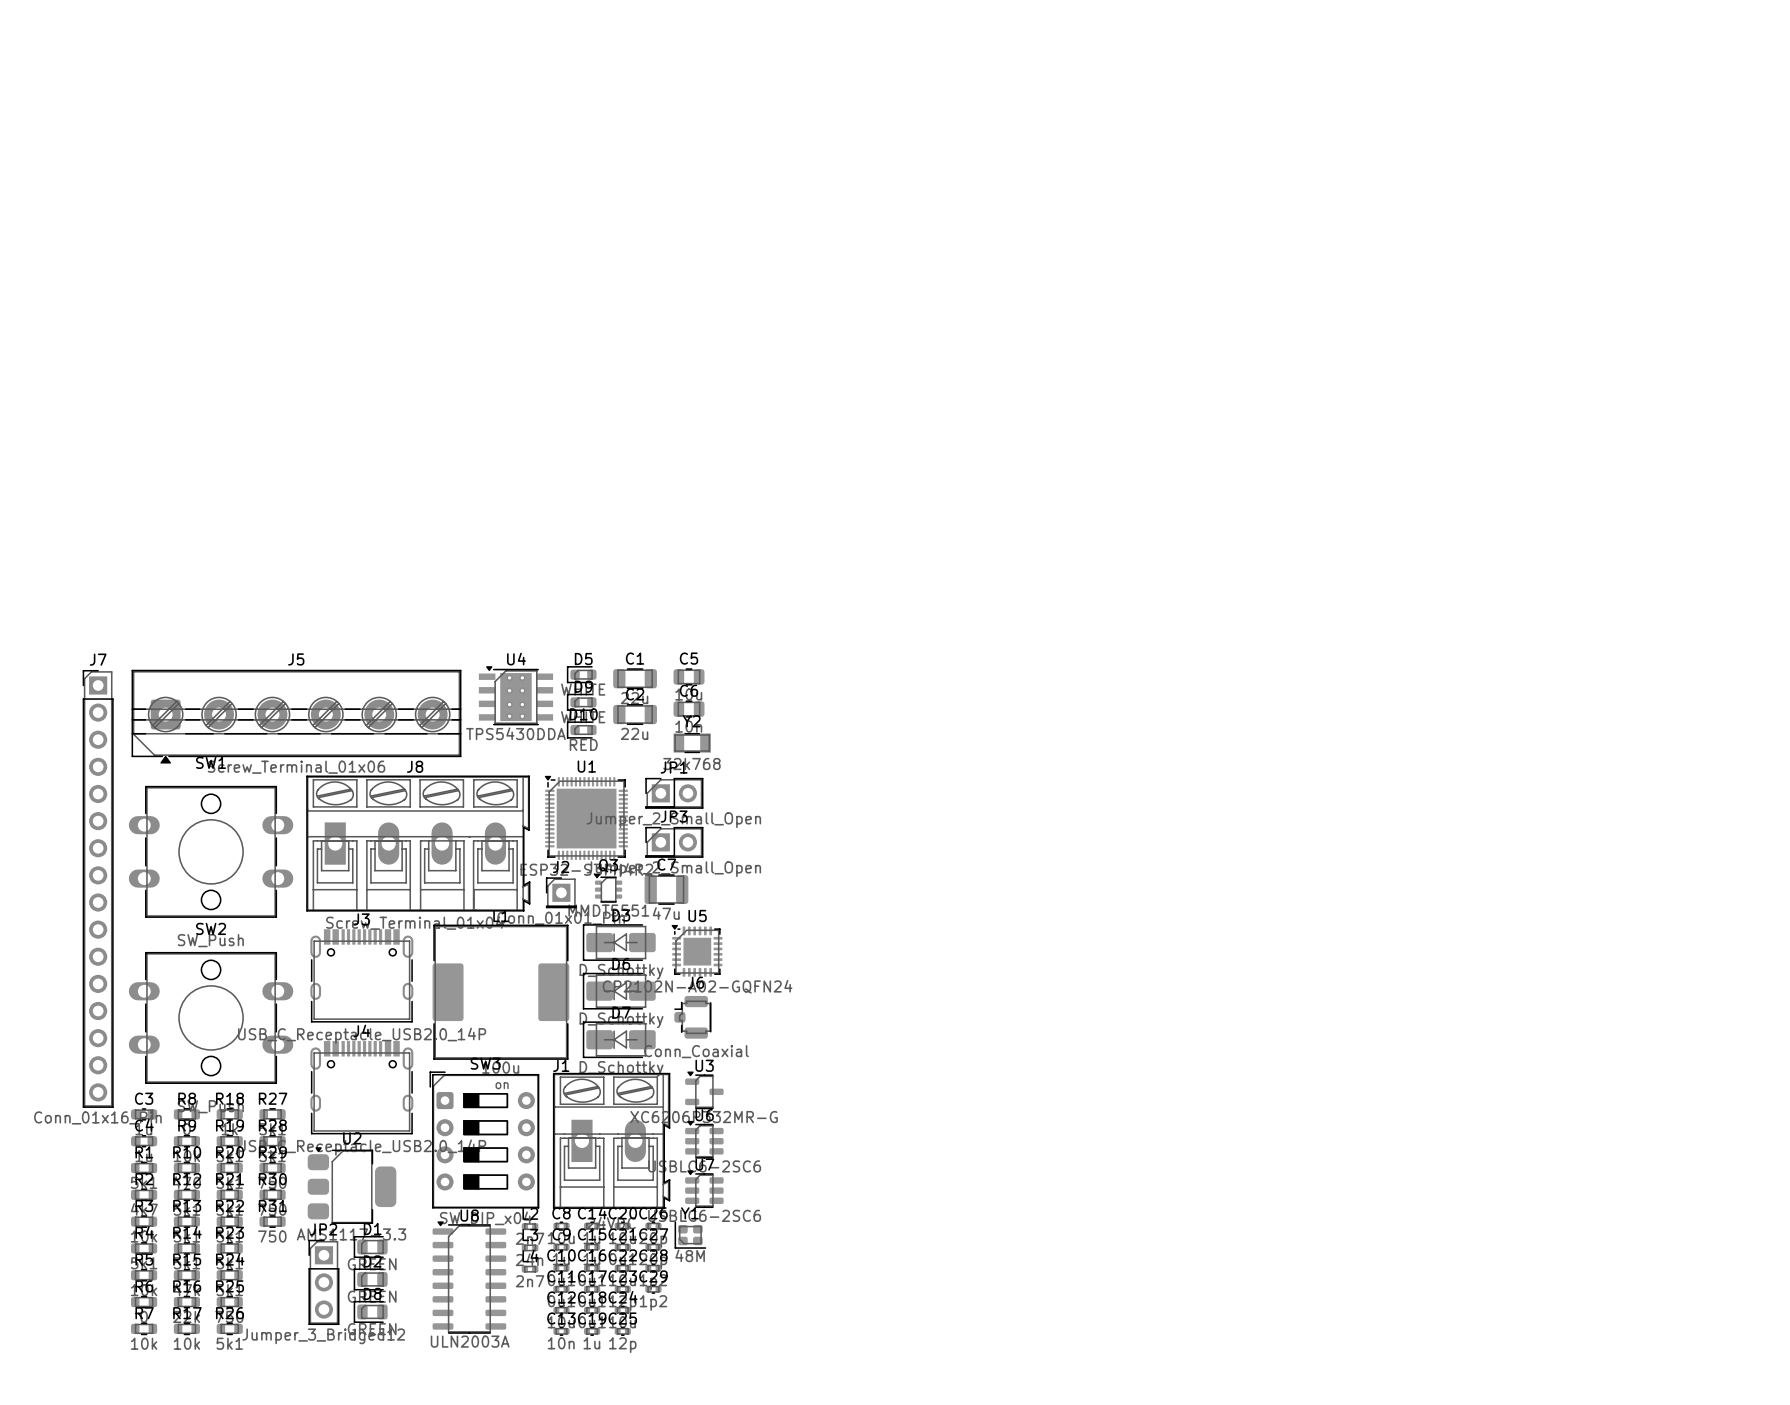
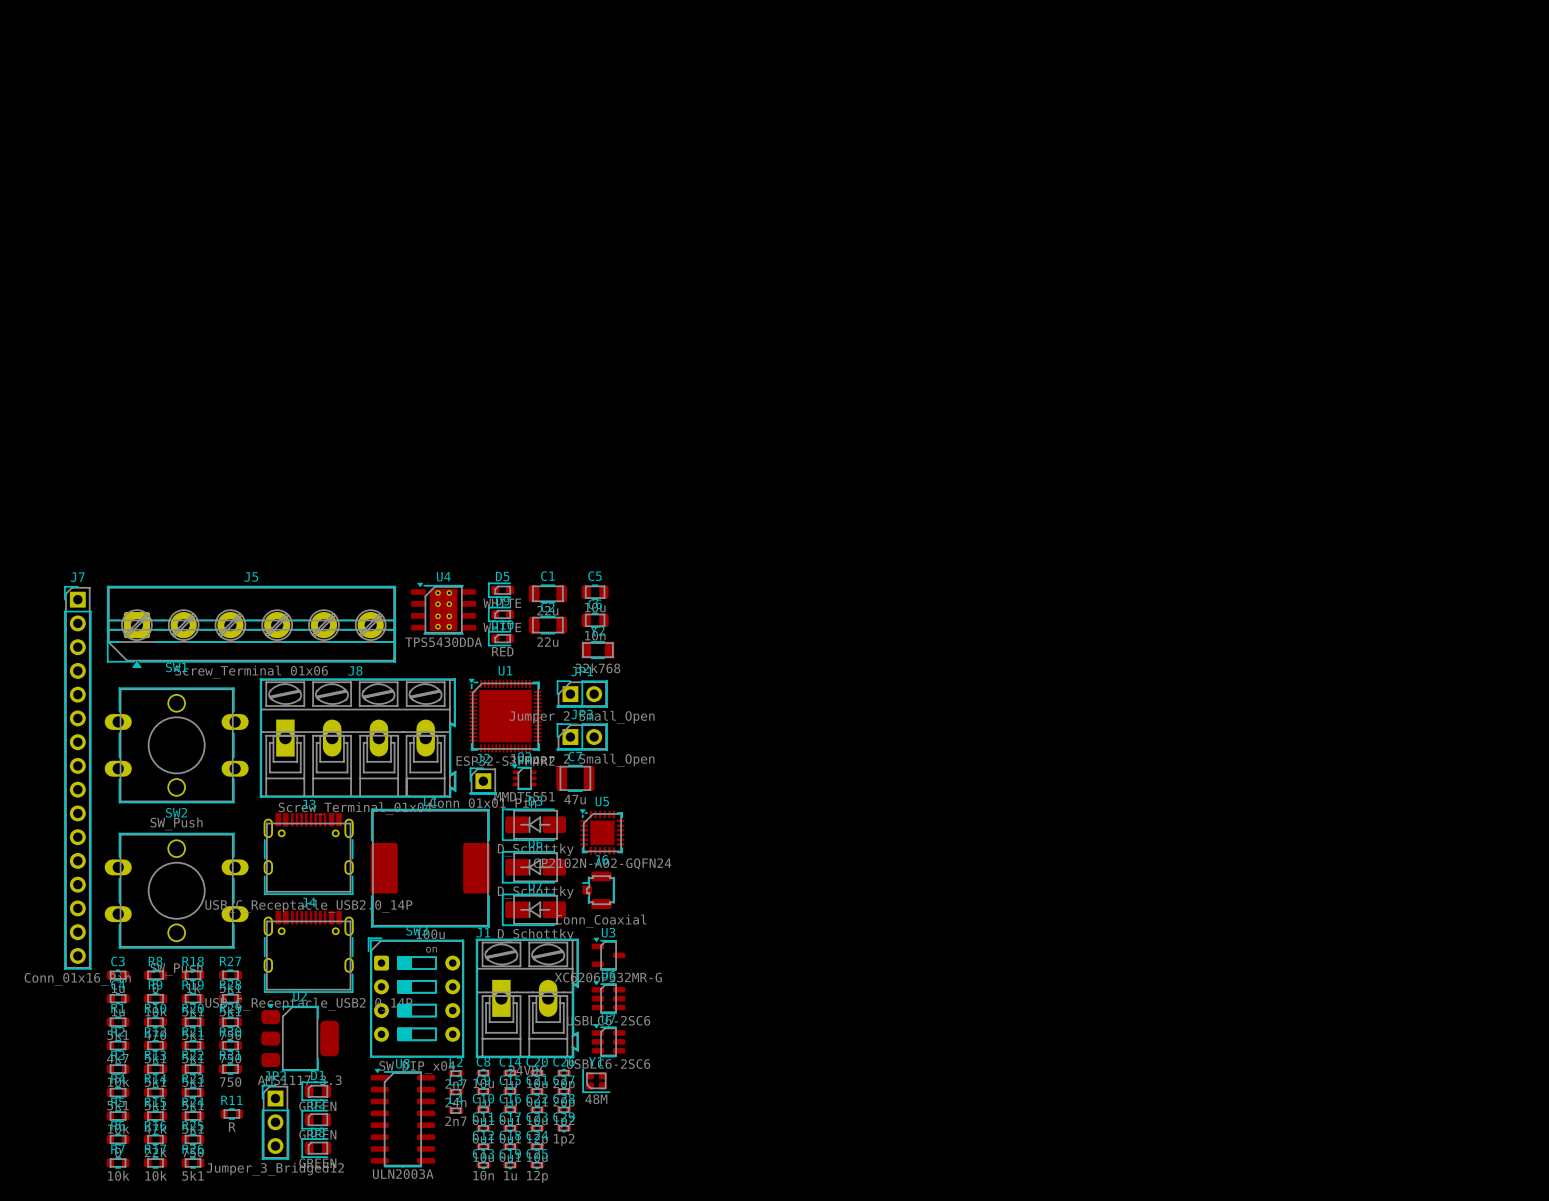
R11: none -> R (231, 1114)

